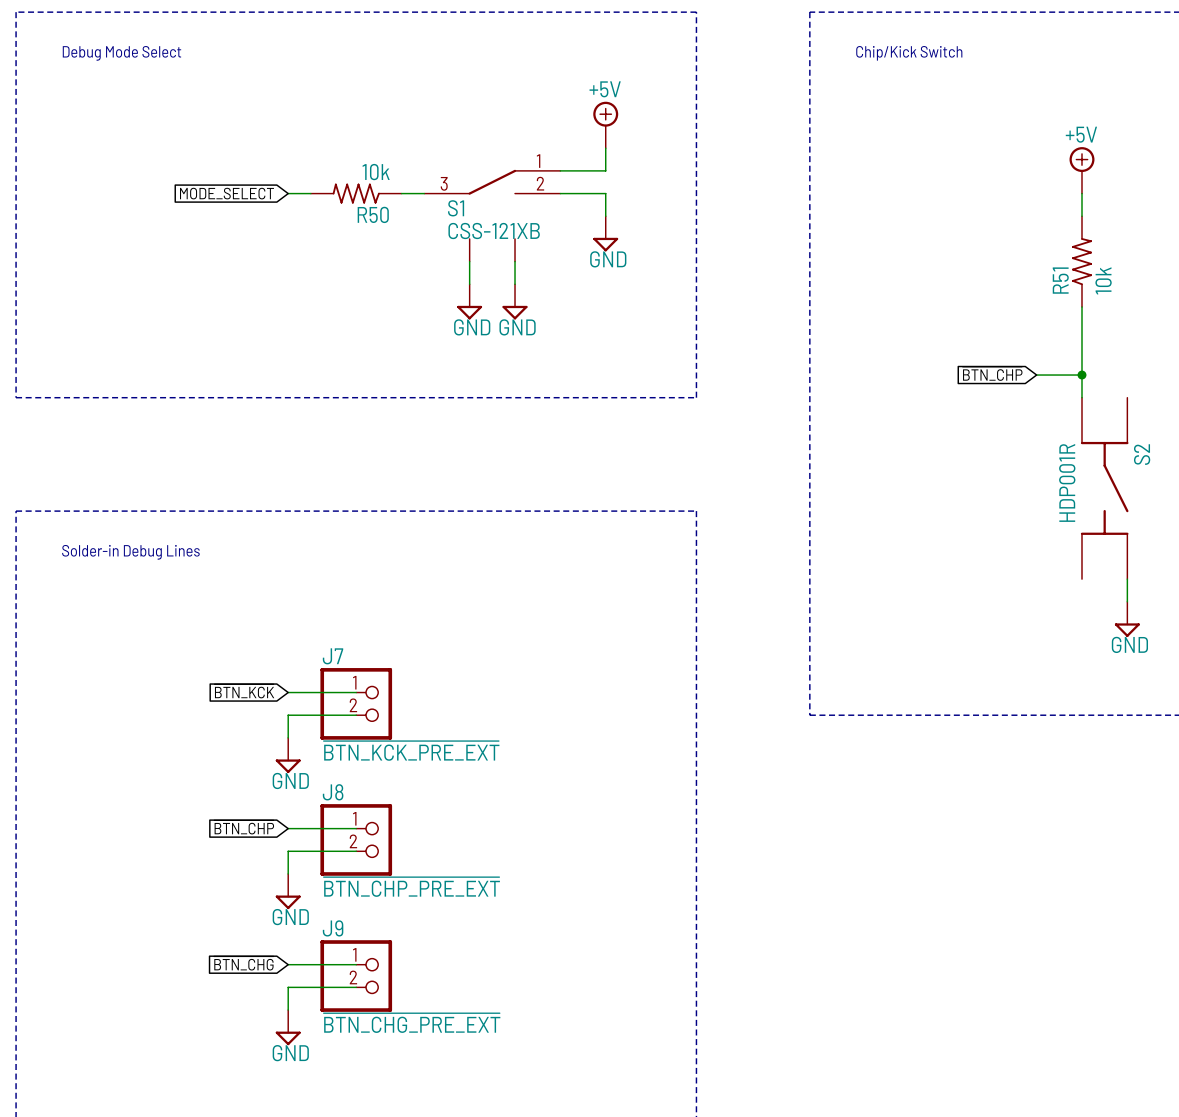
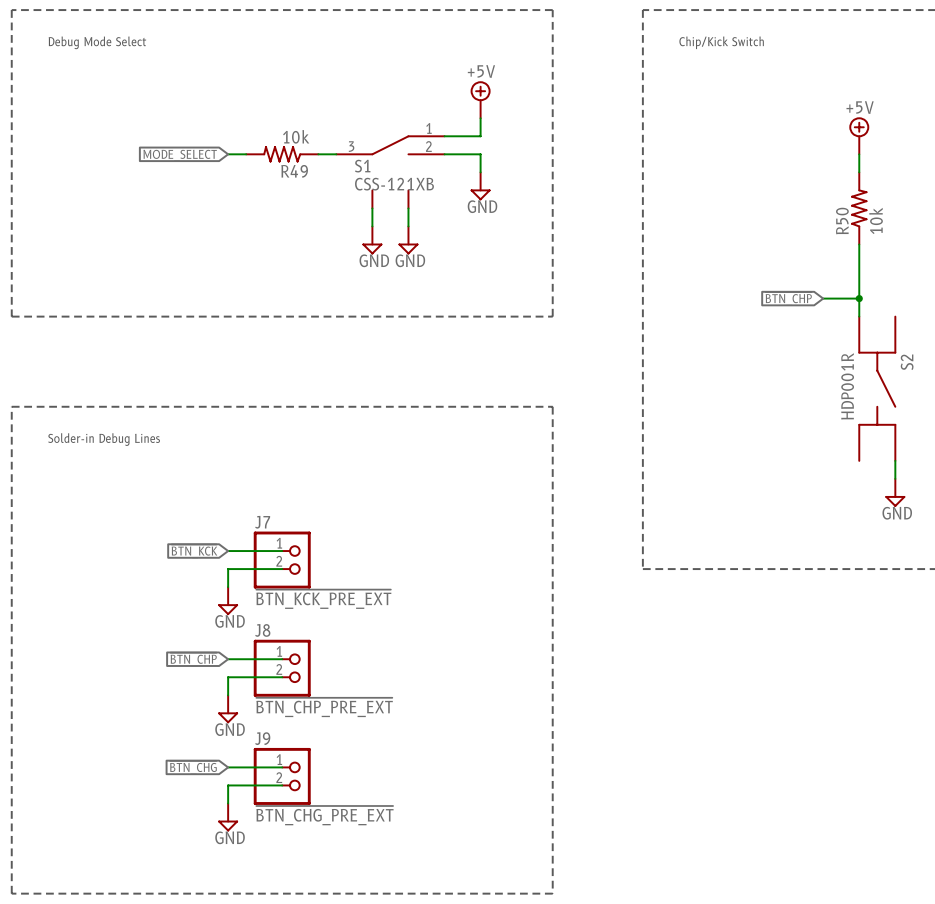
R50 name: R50 (373, 214) -> R49 (294, 171)
R51 name: R51 (1060, 280) -> R50 (842, 221)

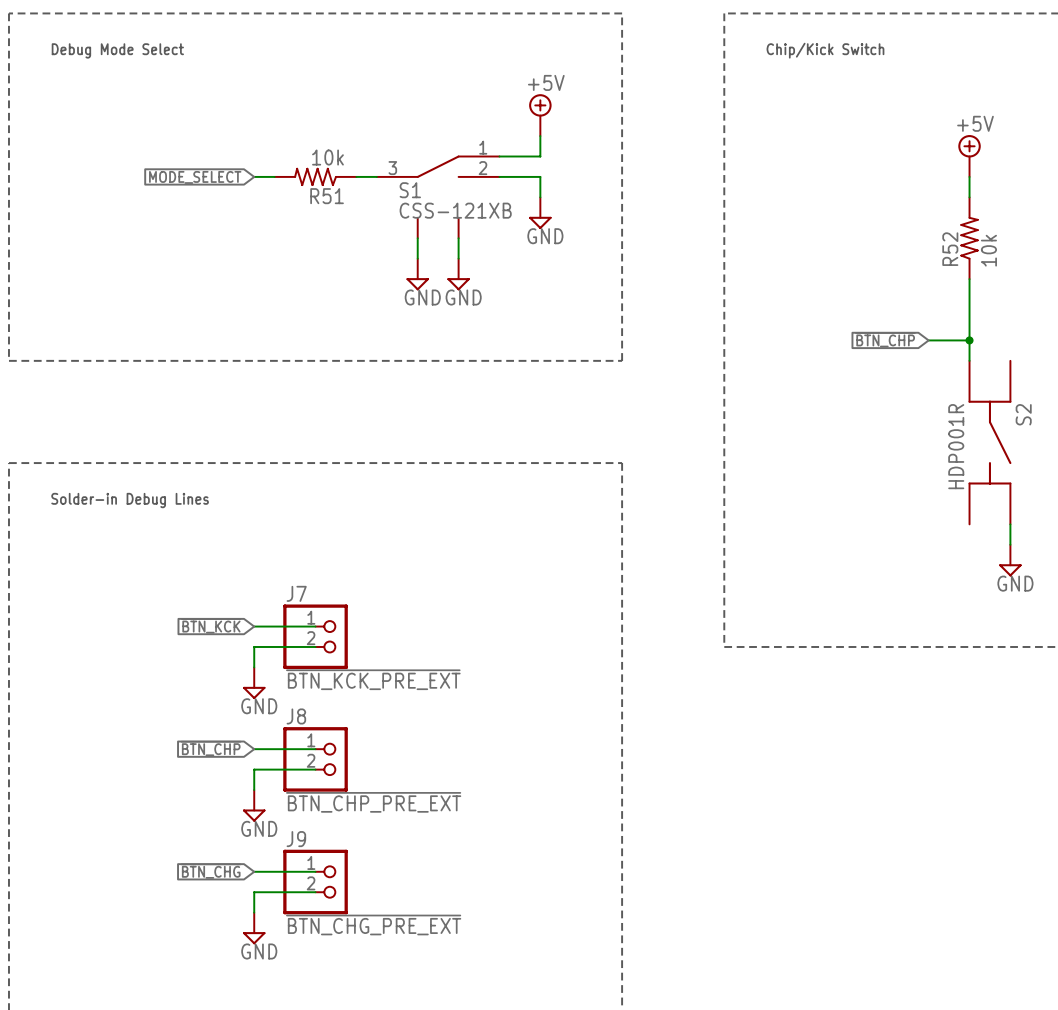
R49 name: R49 (294, 171) -> R51 (327, 196)
R50 name: R50 (842, 221) -> R52 (950, 249)

